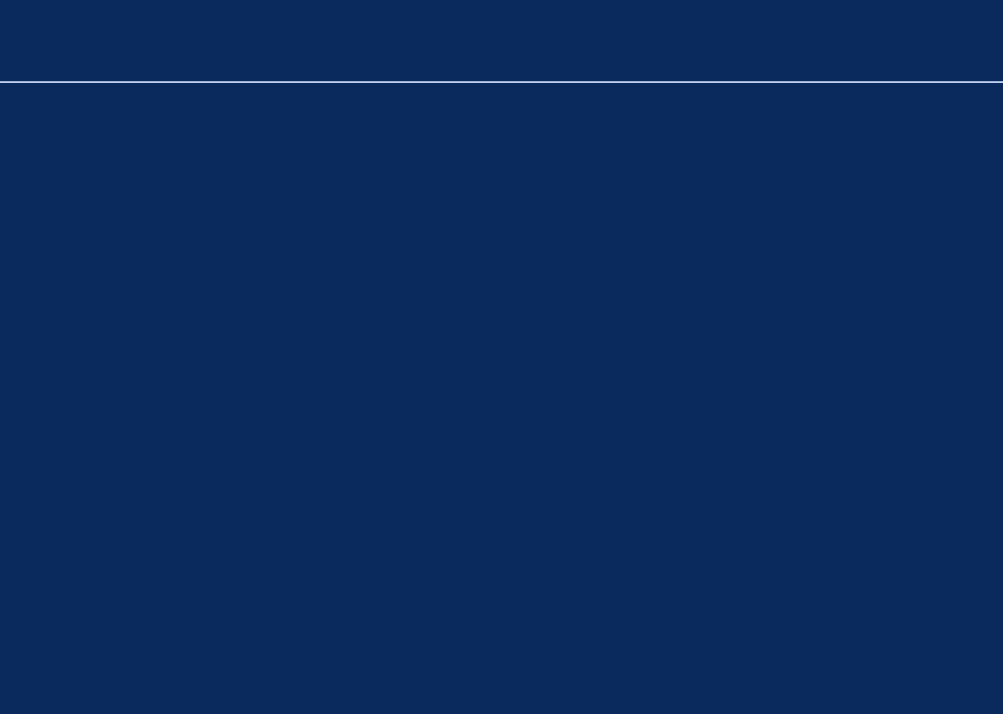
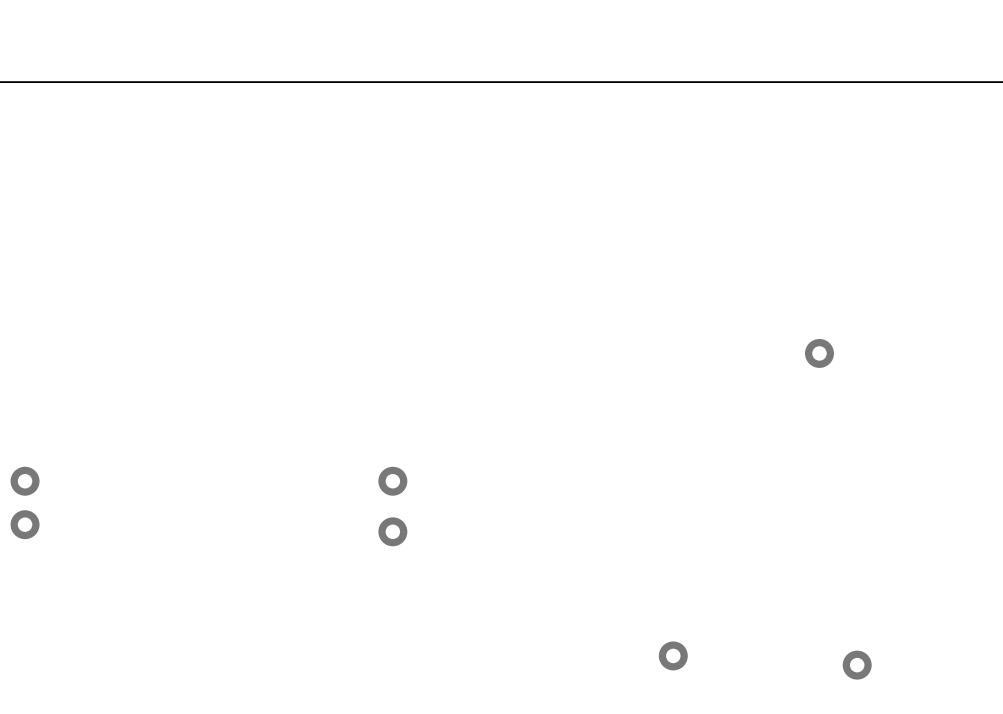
via: none -> (819, 353)
via: none -> (25, 481)
via: none -> (392, 481)
via: none -> (25, 524)
via: none -> (392, 531)
via: none -> (673, 655)
via: none -> (857, 665)

